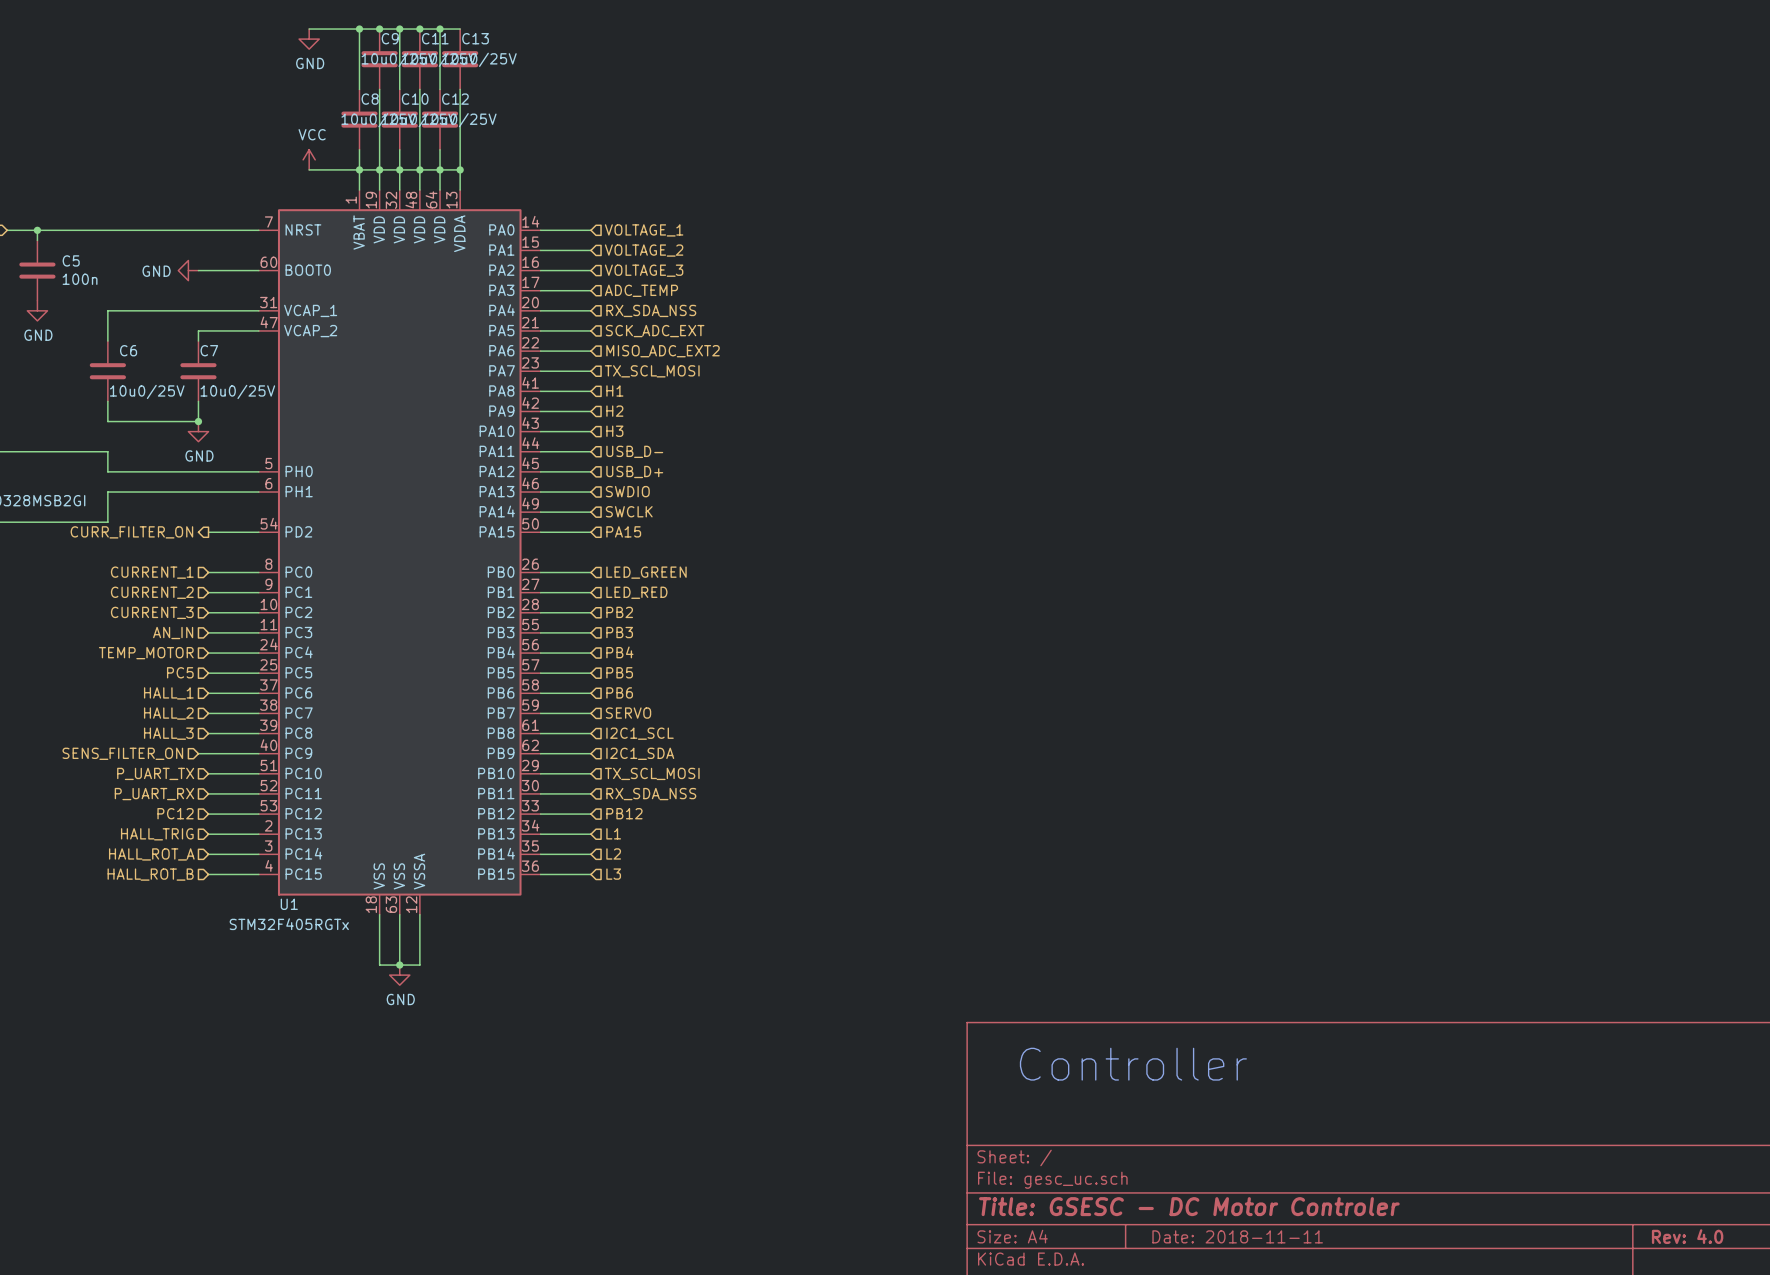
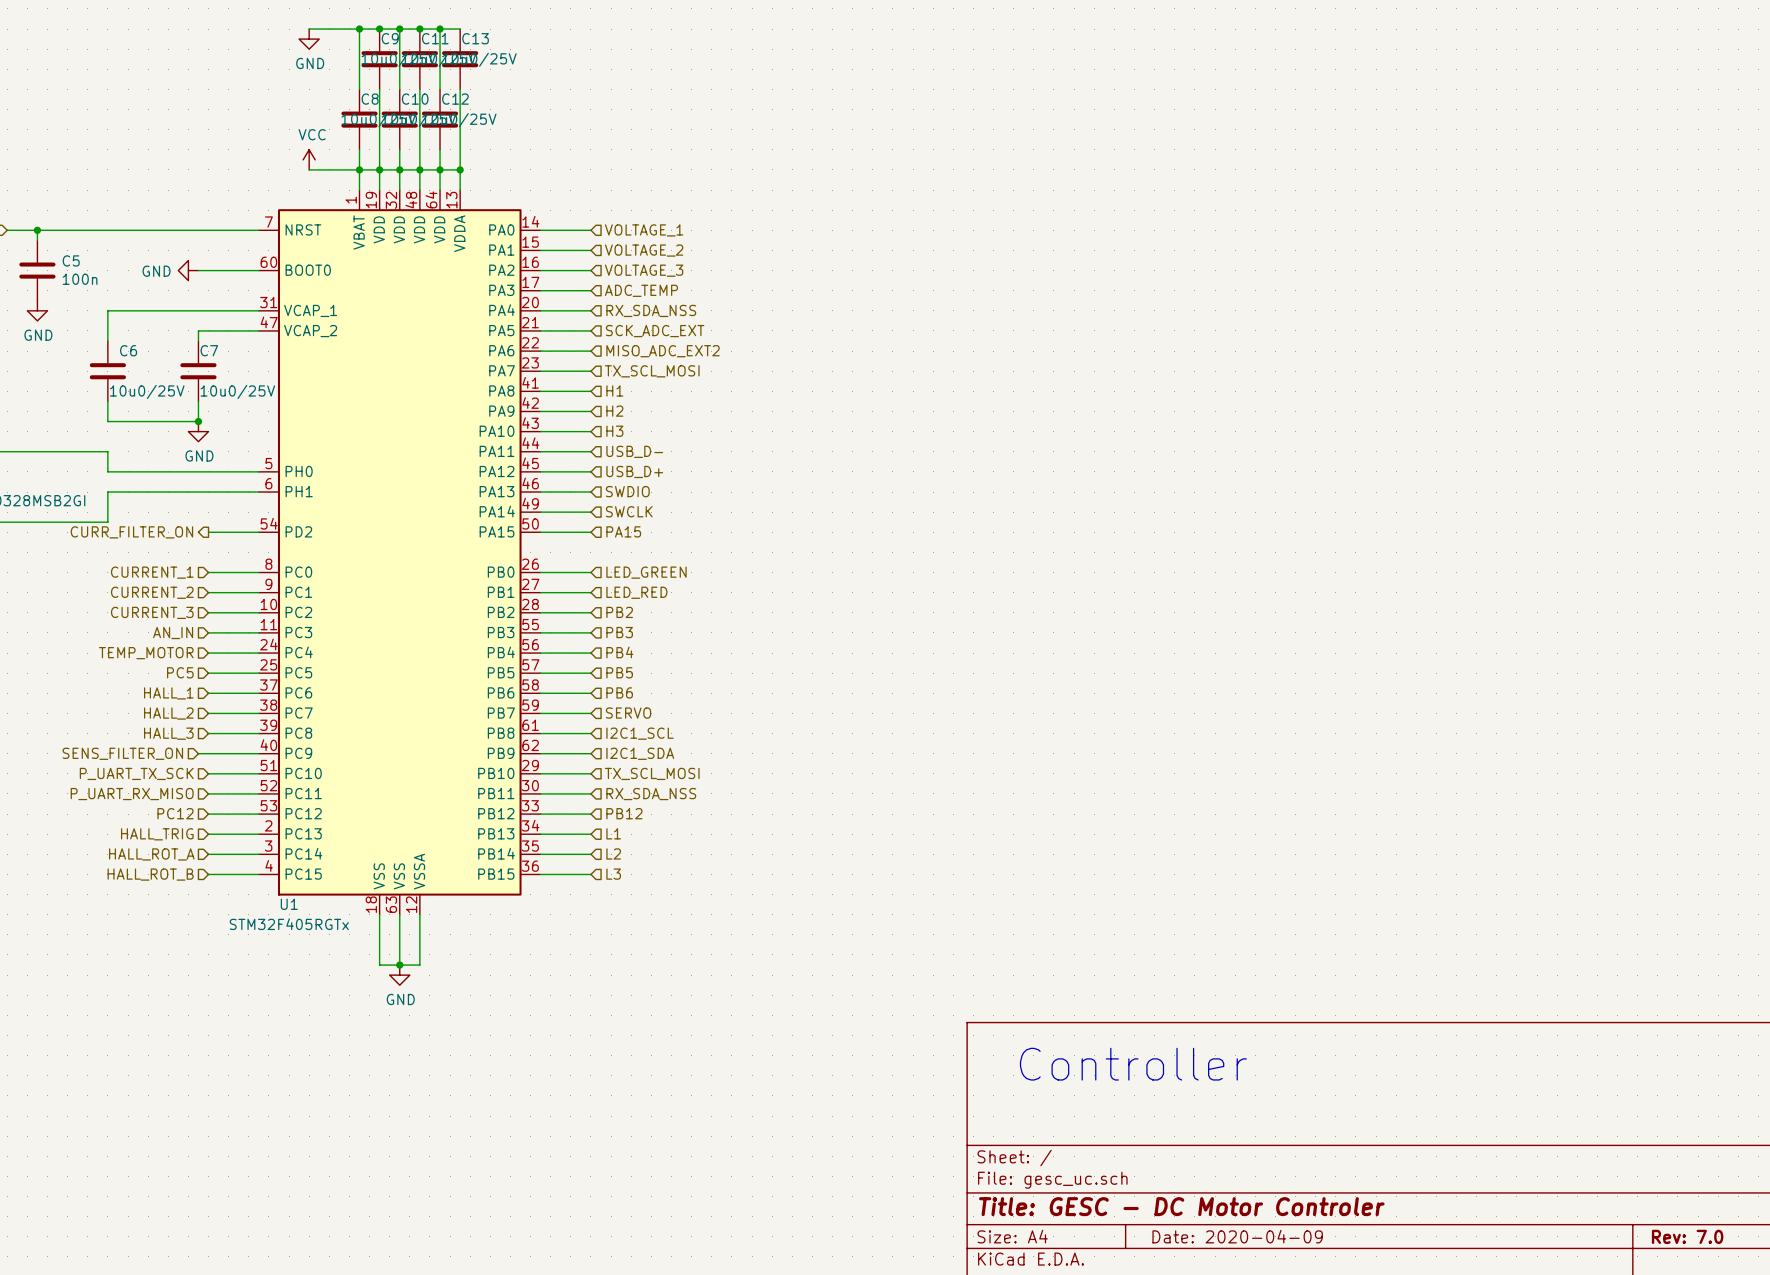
hierarchical label: P_UART_TX (155, 773) -> P_UART_TX_SCK (136, 773)
hierarchical label: P_UART_RX (154, 794) -> P_UART_RX_MISO (132, 794)
title block: Title: GSESC - DC Motor Controler (1189, 1206) -> Title: GESC - DC Motor Controler (1181, 1206)
title block: Date: 2018-11-11 (1237, 1236) -> Date: 2020-04-09 (1237, 1236)
title block: Rev: 4.0 (1687, 1236) -> Rev: 7.0 (1687, 1236)

